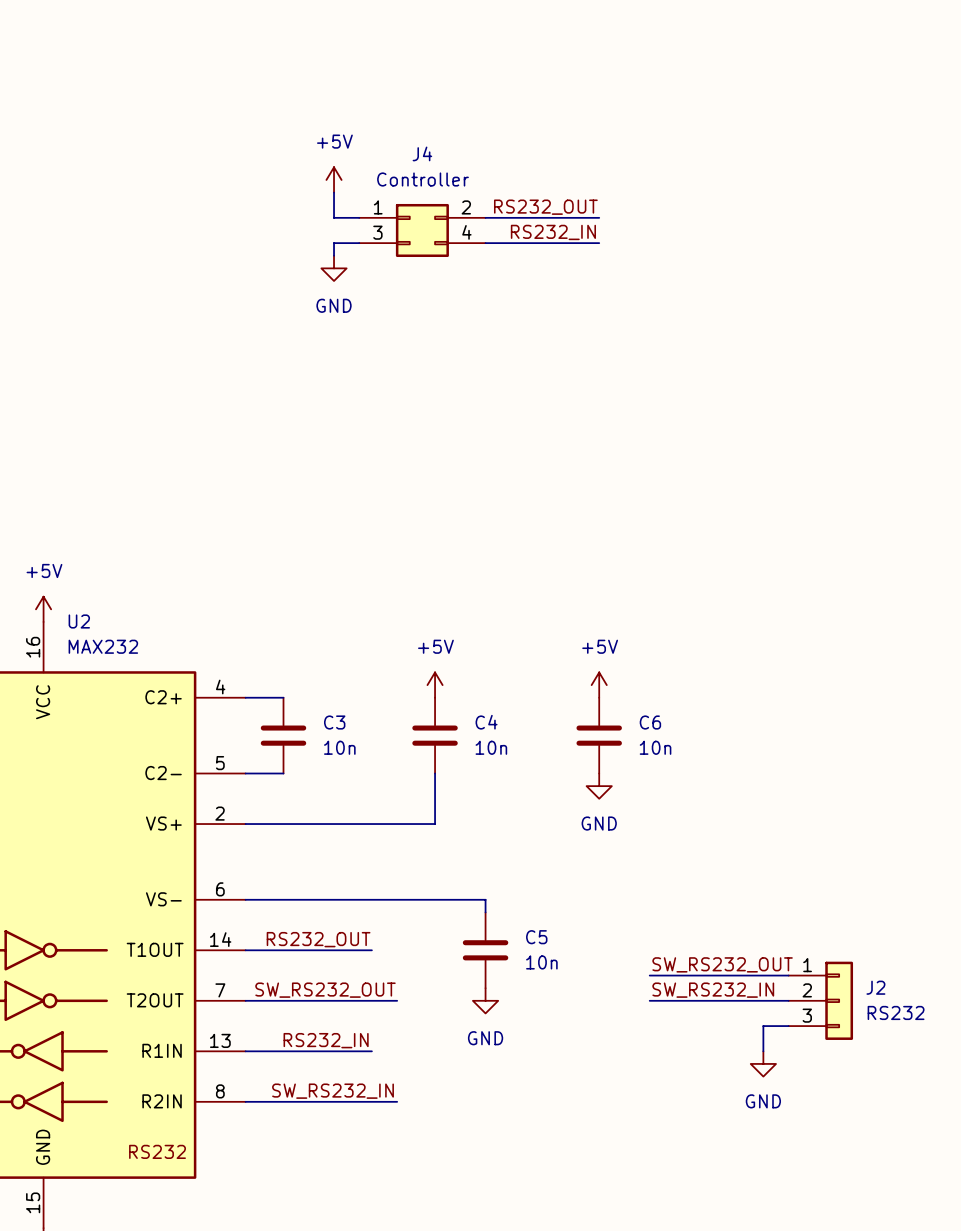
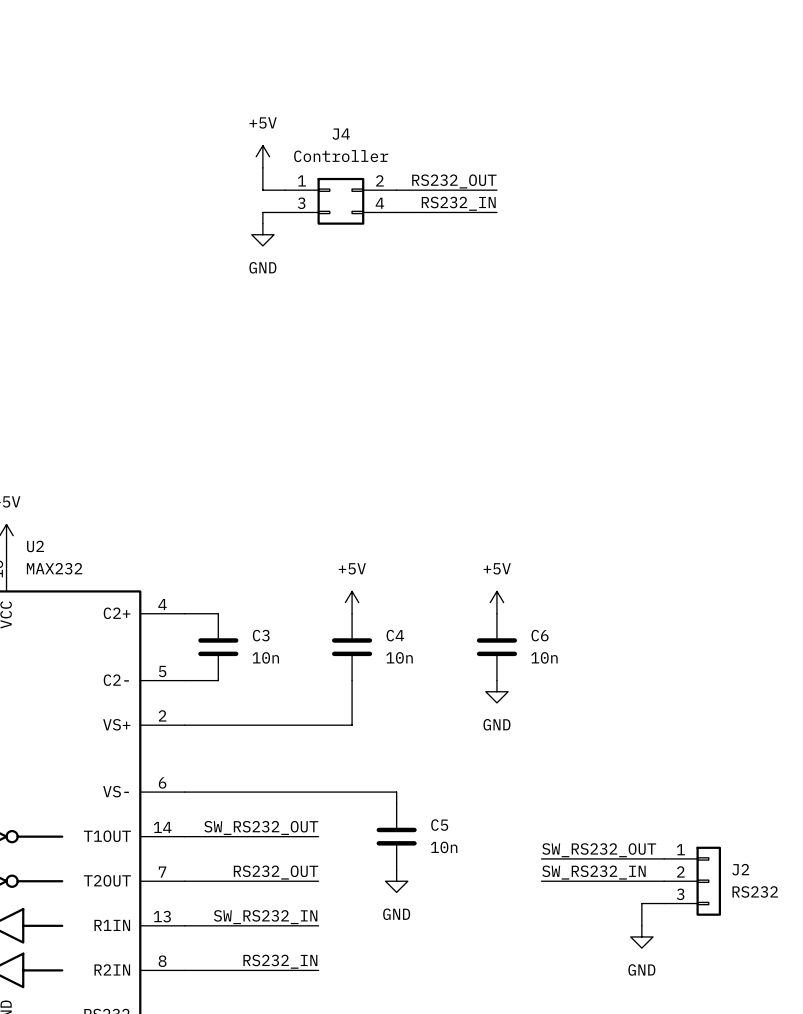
label: RS232_OUT (318, 939) -> SW_RS232_OUT (261, 827)
wire: none -> (296, 836) (318, 836)
label: SW_RS232_OUT (325, 990) -> RS232_OUT (276, 872)
label: RS232_IN (326, 1040) -> SW_RS232_IN (265, 917)
wire: none -> (296, 925) (318, 925)
label: SW_RS232_IN (333, 1091) -> RS232_IN (280, 961)

